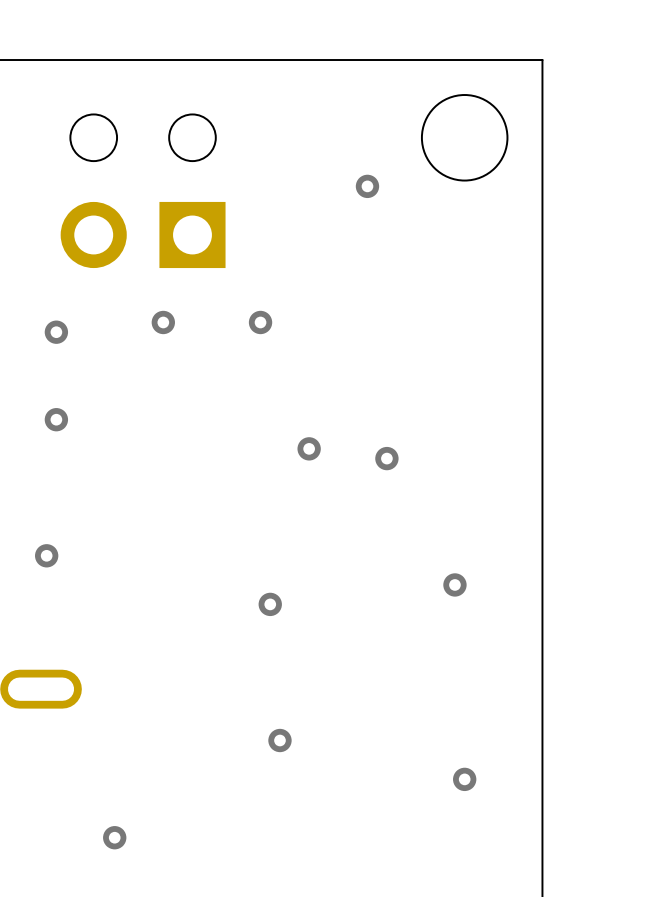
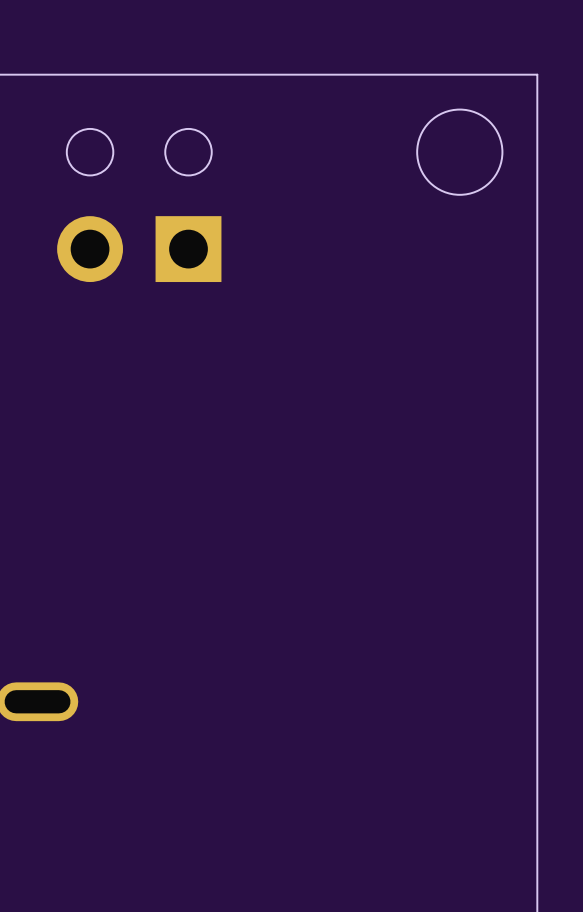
via: (367, 186) -> none
via: (163, 322) -> none
via: (260, 322) -> none
via: (56, 332) -> none
via: (56, 419) -> none
via: (309, 448) -> none
via: (386, 458) -> none
via: (46, 555) -> none
via: (454, 584) -> none
via: (270, 604) -> none
via: (279, 740) -> none
via: (464, 779) -> none
via: (114, 837) -> none

